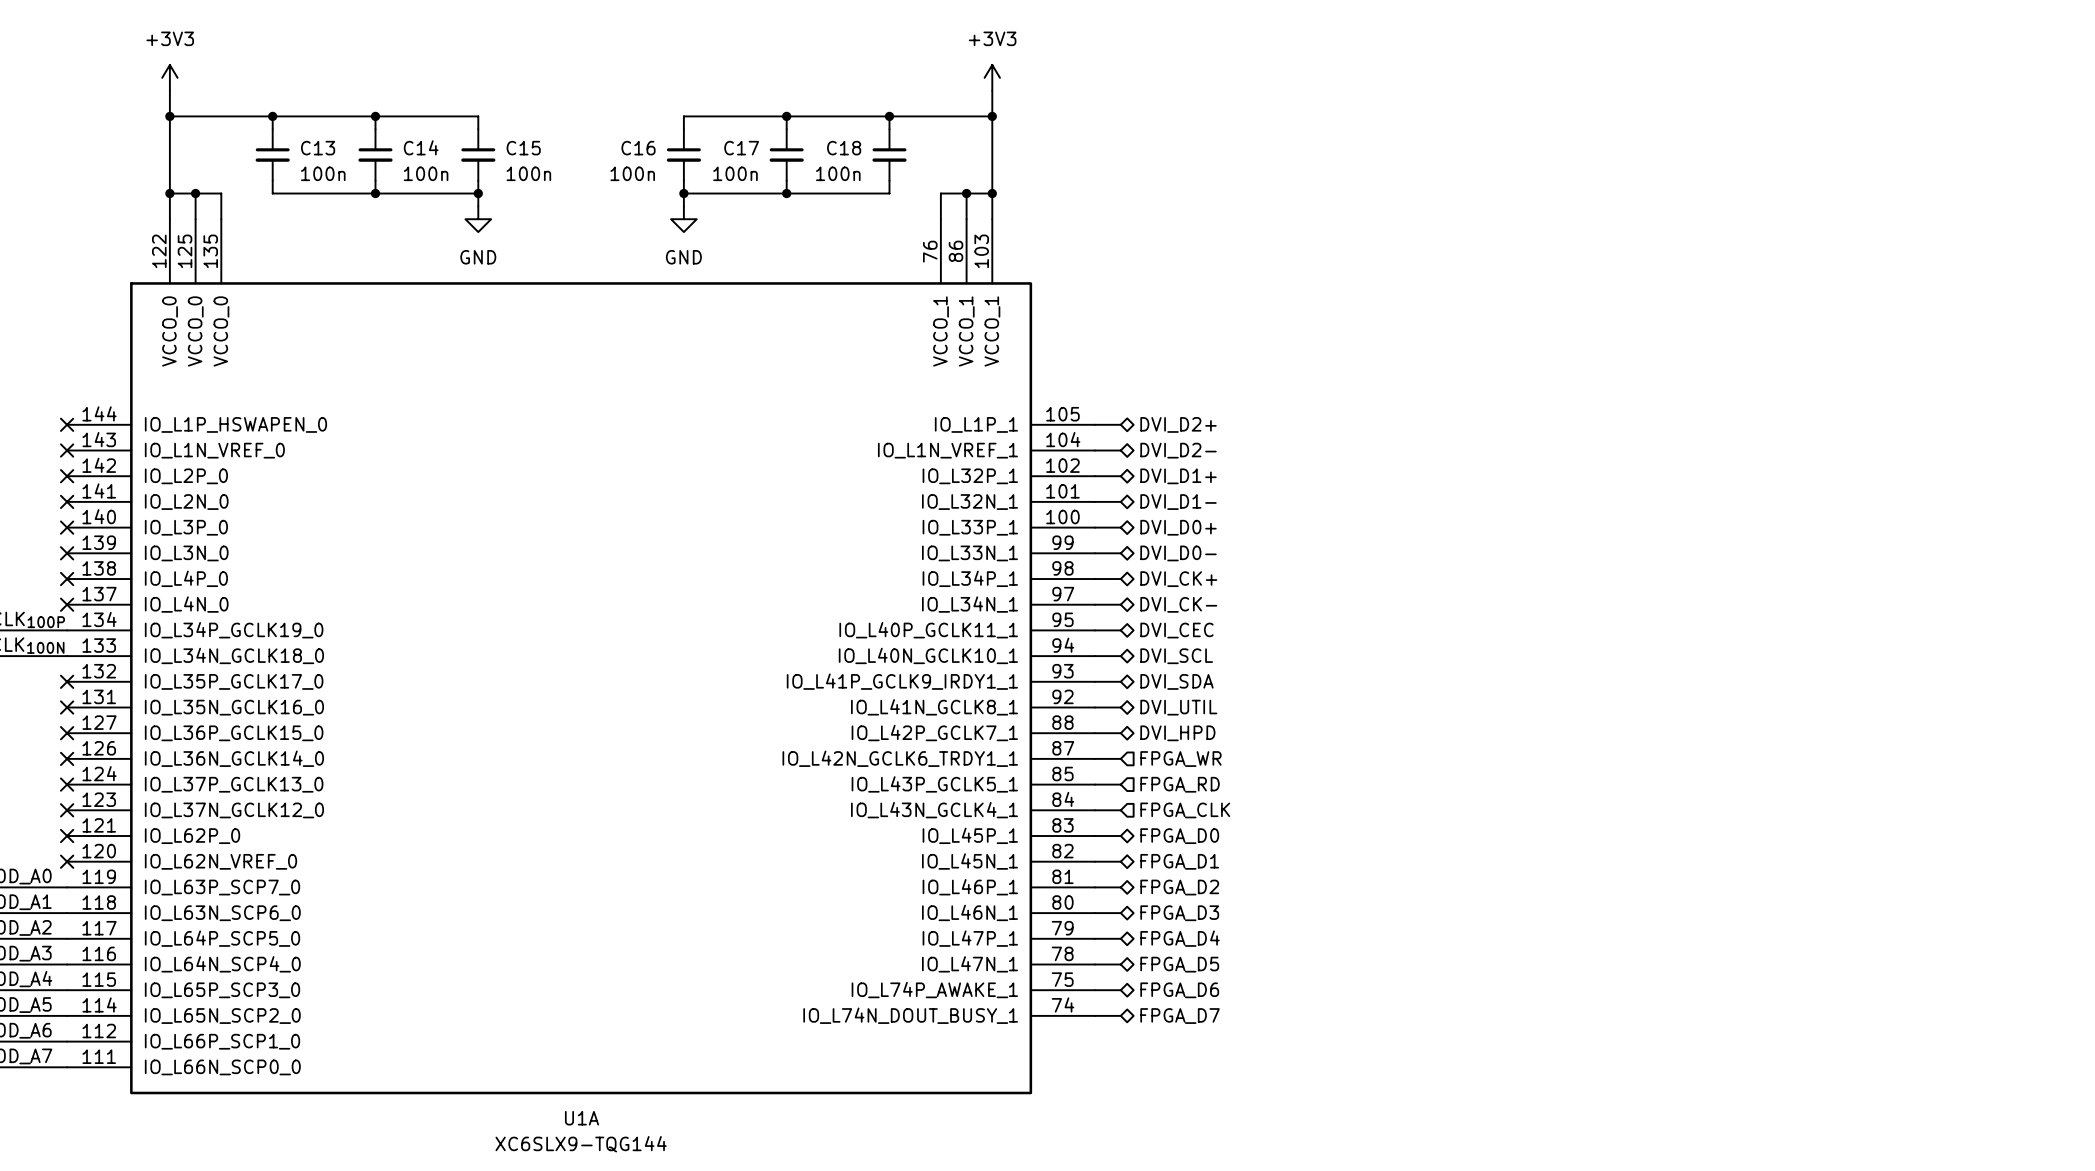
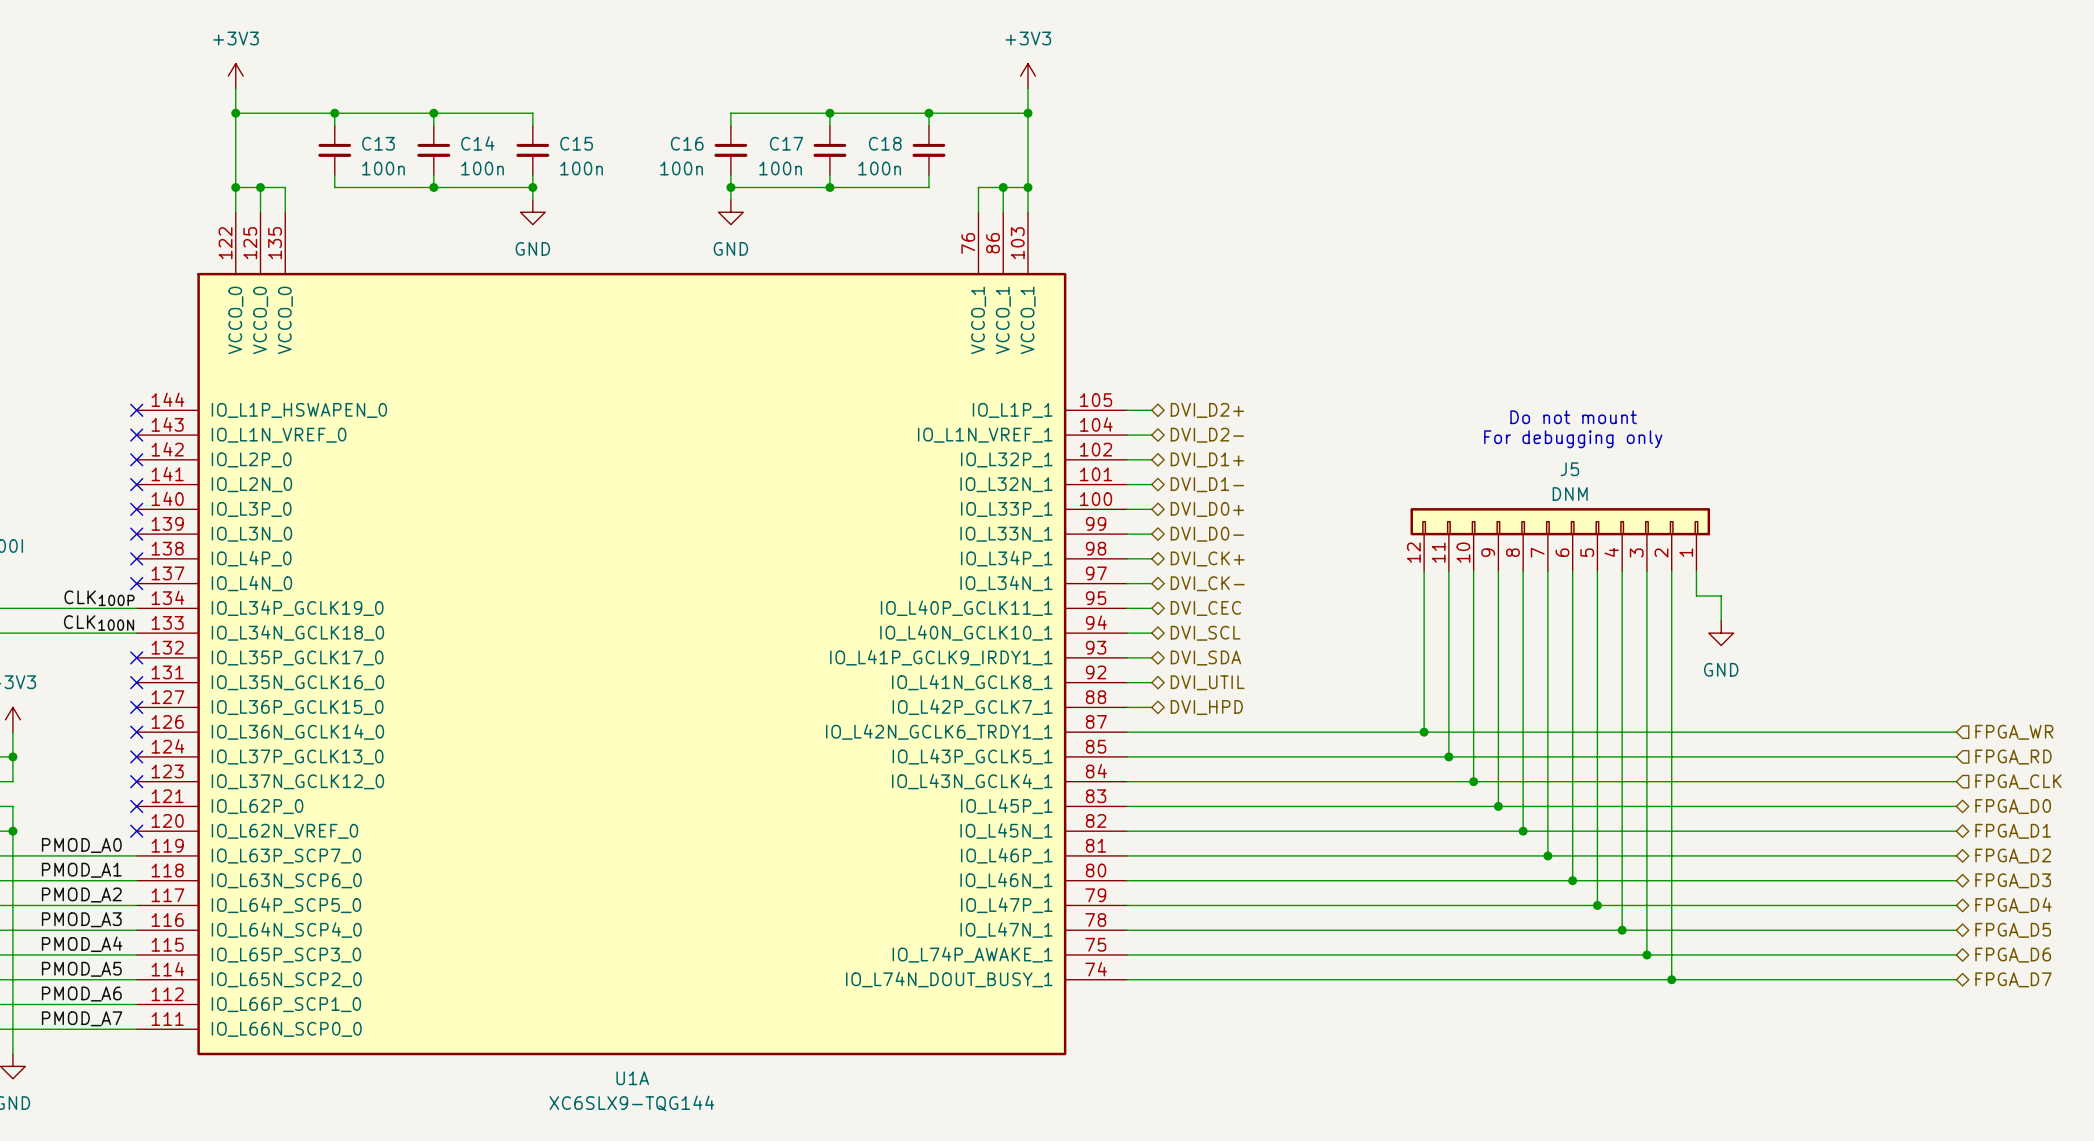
text: none -> Do not mount (1573, 417)
text: none -> For debugging only (1573, 439)
J5: none -> DNM (1560, 539)
wire: none -> (1424, 571) (1424, 732)
wire: none -> (1448, 571) (1448, 756)
wire: none -> (1473, 571) (1473, 781)
wire: none -> (1498, 571) (1498, 806)
wire: none -> (1523, 571) (1523, 831)
wire: none -> (1547, 571) (1547, 855)
wire: none -> (1572, 571) (1572, 880)
wire: none -> (1597, 571) (1597, 905)
wire: none -> (1622, 571) (1622, 930)
wire: none -> (1646, 571) (1646, 954)
wire: none -> (1671, 571) (1671, 979)
wire: none -> (1696, 571) (1696, 595) (1721, 595) (1721, 620)
power symbol: none -> GND (1721, 633)
wire: none -> (1151, 732) (1956, 732)
junction: none -> (1424, 732)
hierarchical label: FPGA_WR (1180, 759) -> none
hierarchical label: none -> FPGA_WR (2014, 732)
wire: none -> (1151, 756) (1956, 756)
hierarchical label: FPGA_RD (1180, 784) -> none
junction: none -> (1448, 756)
hierarchical label: none -> FPGA_RD (2013, 757)
wire: none -> (1151, 781) (1956, 781)
hierarchical label: FPGA_CLK (1185, 810) -> none
junction: none -> (1473, 781)
hierarchical label: none -> FPGA_CLK (2018, 781)
wire: none -> (1151, 806) (1956, 806)
hierarchical label: FPGA_D0 (1179, 836) -> none
junction: none -> (1498, 806)
hierarchical label: none -> FPGA_D0 (2013, 806)
wire: none -> (1151, 831) (1956, 831)
hierarchical label: FPGA_D1 (1179, 861) -> none
junction: none -> (1523, 831)
hierarchical label: none -> FPGA_D1 (2013, 831)
wire: none -> (1151, 855) (1956, 855)
hierarchical label: FPGA_D2 (1179, 887) -> none
junction: none -> (1547, 855)
hierarchical label: none -> FPGA_D2 (2013, 856)
wire: none -> (1151, 880) (1956, 880)
hierarchical label: FPGA_D3 (1179, 913) -> none
junction: none -> (1572, 880)
hierarchical label: none -> FPGA_D3 (2013, 880)
wire: none -> (1151, 905) (1956, 905)
hierarchical label: FPGA_D4 (1180, 938) -> none
junction: none -> (1597, 905)
hierarchical label: none -> FPGA_D4 (2013, 905)
wire: none -> (1151, 930) (1956, 930)
hierarchical label: FPGA_D5 (1179, 964) -> none
junction: none -> (1622, 930)
hierarchical label: none -> FPGA_D5 (2013, 930)
wire: none -> (1151, 954) (1956, 954)
hierarchical label: FPGA_D6 (1179, 990) -> none
junction: none -> (1646, 954)
hierarchical label: none -> FPGA_D6 (2013, 955)
wire: none -> (1151, 979) (1956, 979)
junction: none -> (1671, 979)
hierarchical label: FPGA_D7 (1180, 1016) -> none
hierarchical label: none -> FPGA_D7 (2013, 979)

